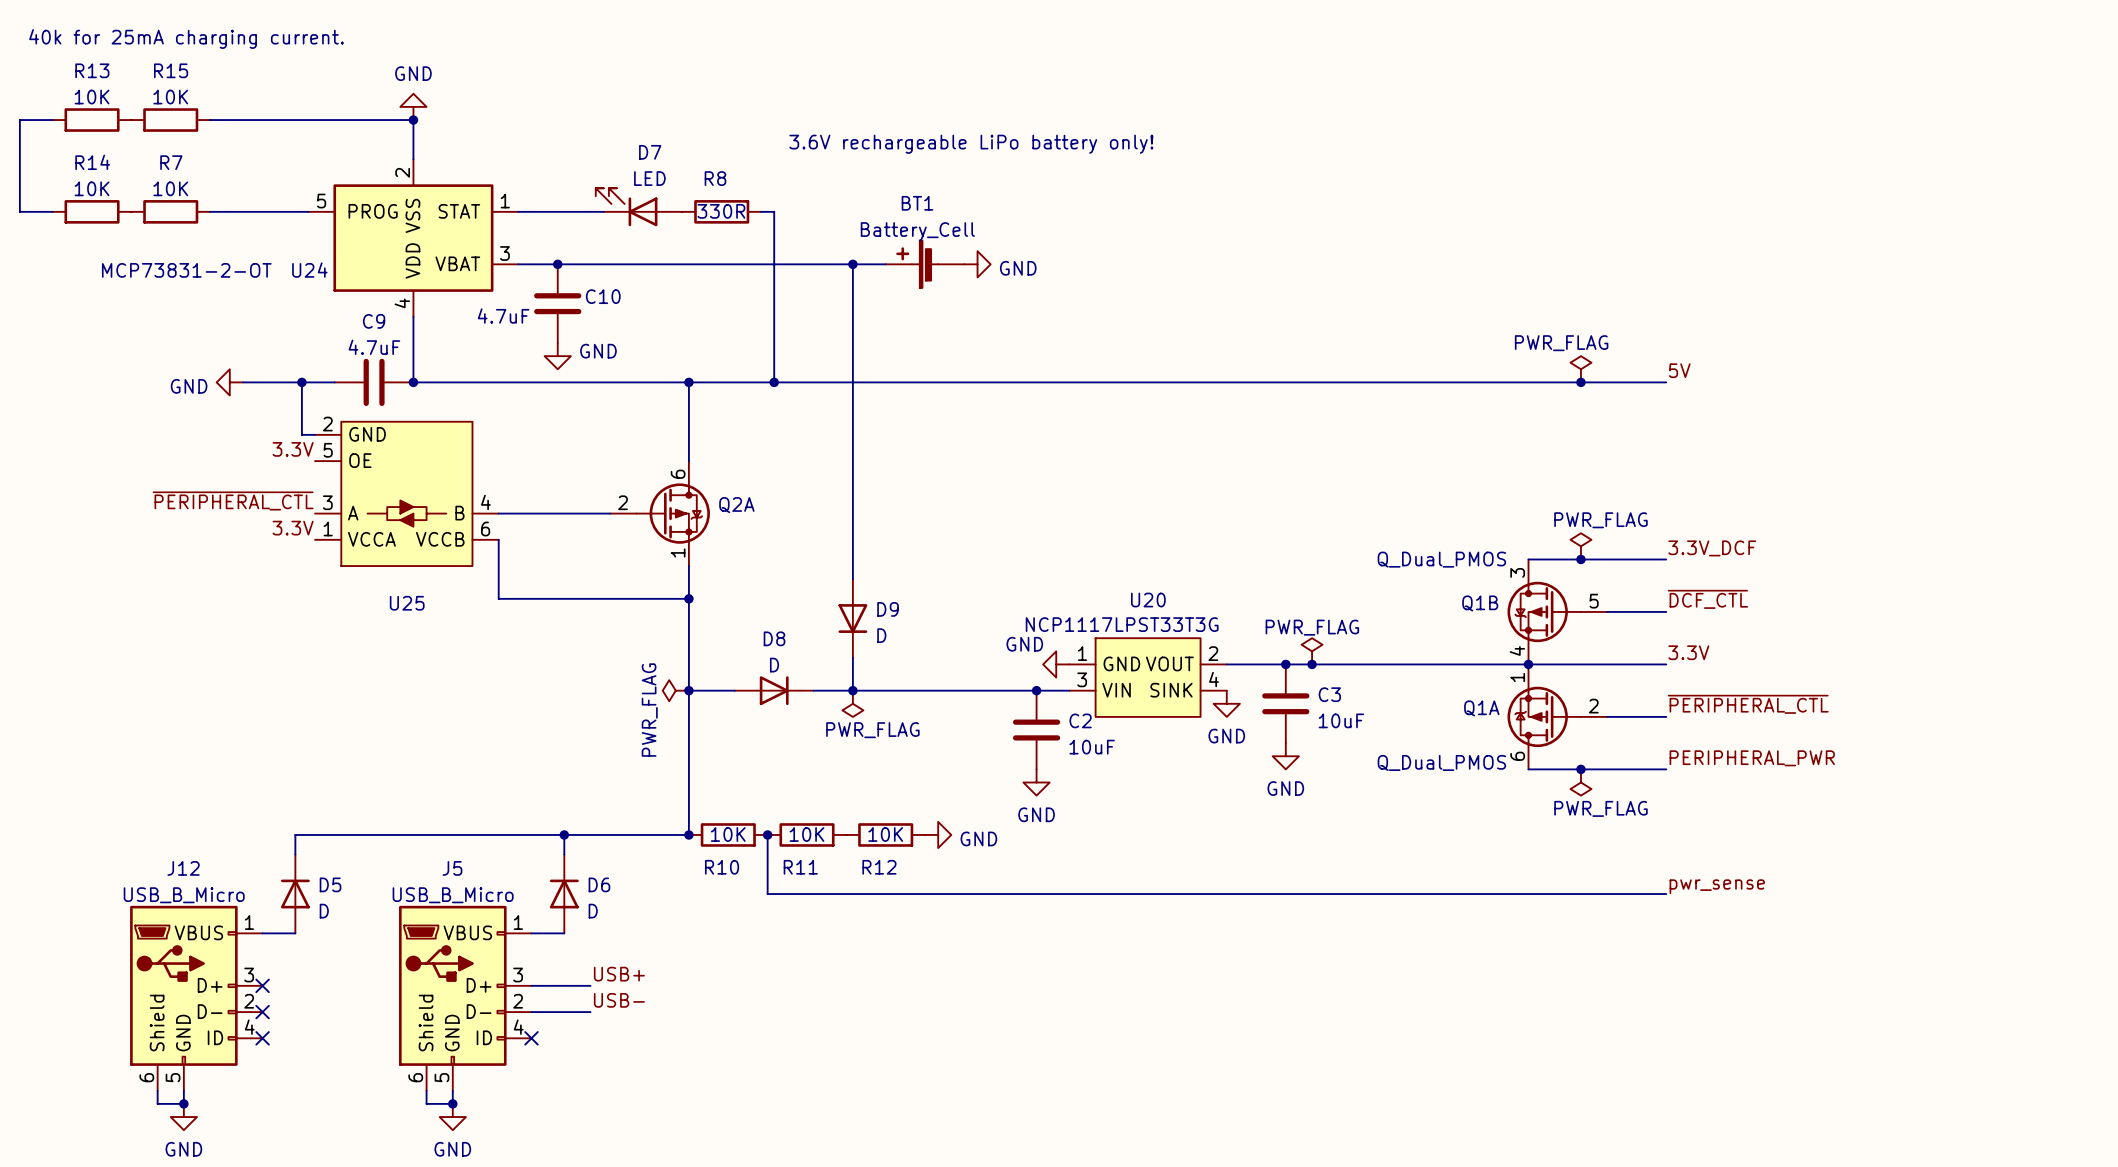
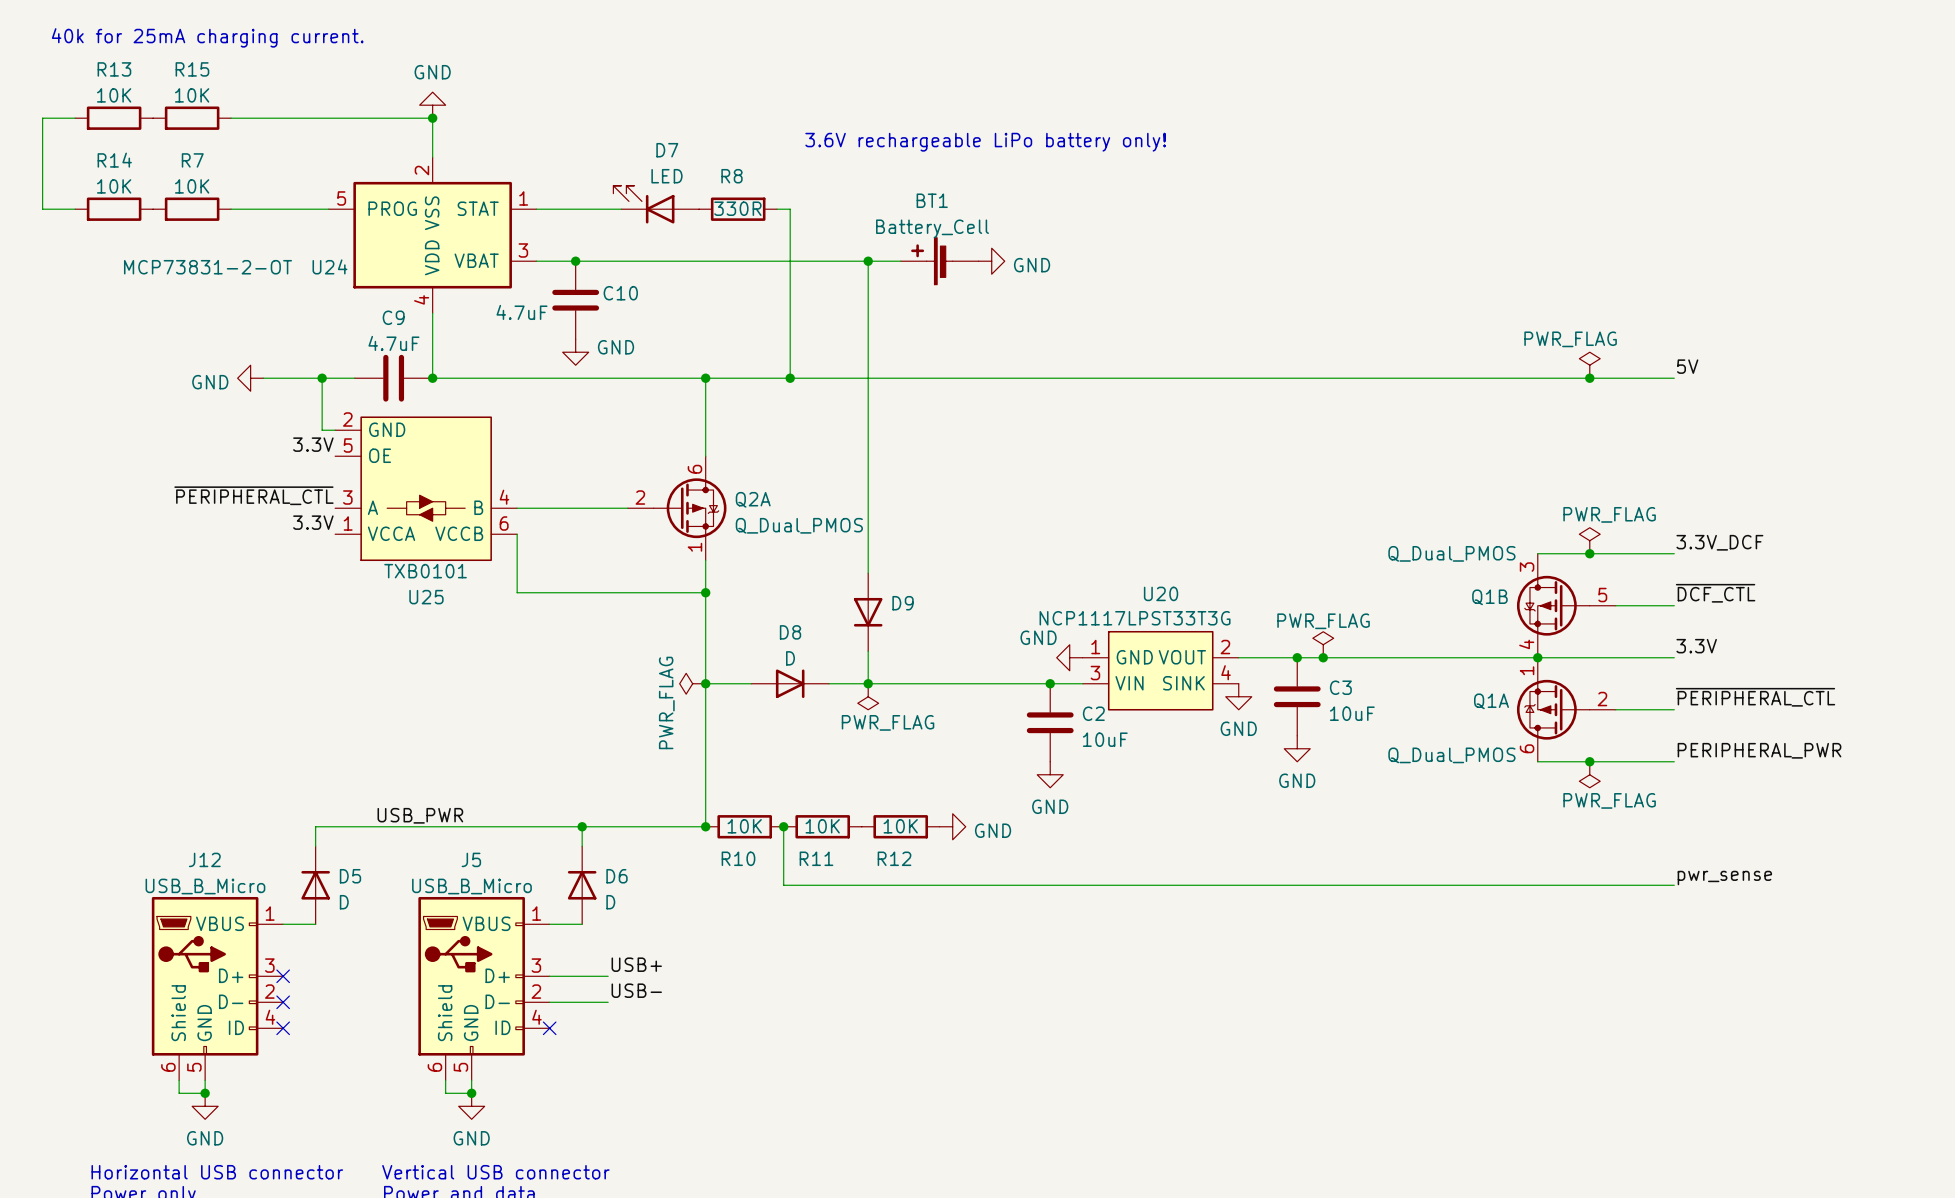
Q2A value: none -> Q_Dual_PMOS (799, 525)
U25 value: none -> TXB0101 (425, 571)
D9 value: D (881, 635) -> none
label: none -> USB_PWR (420, 815)

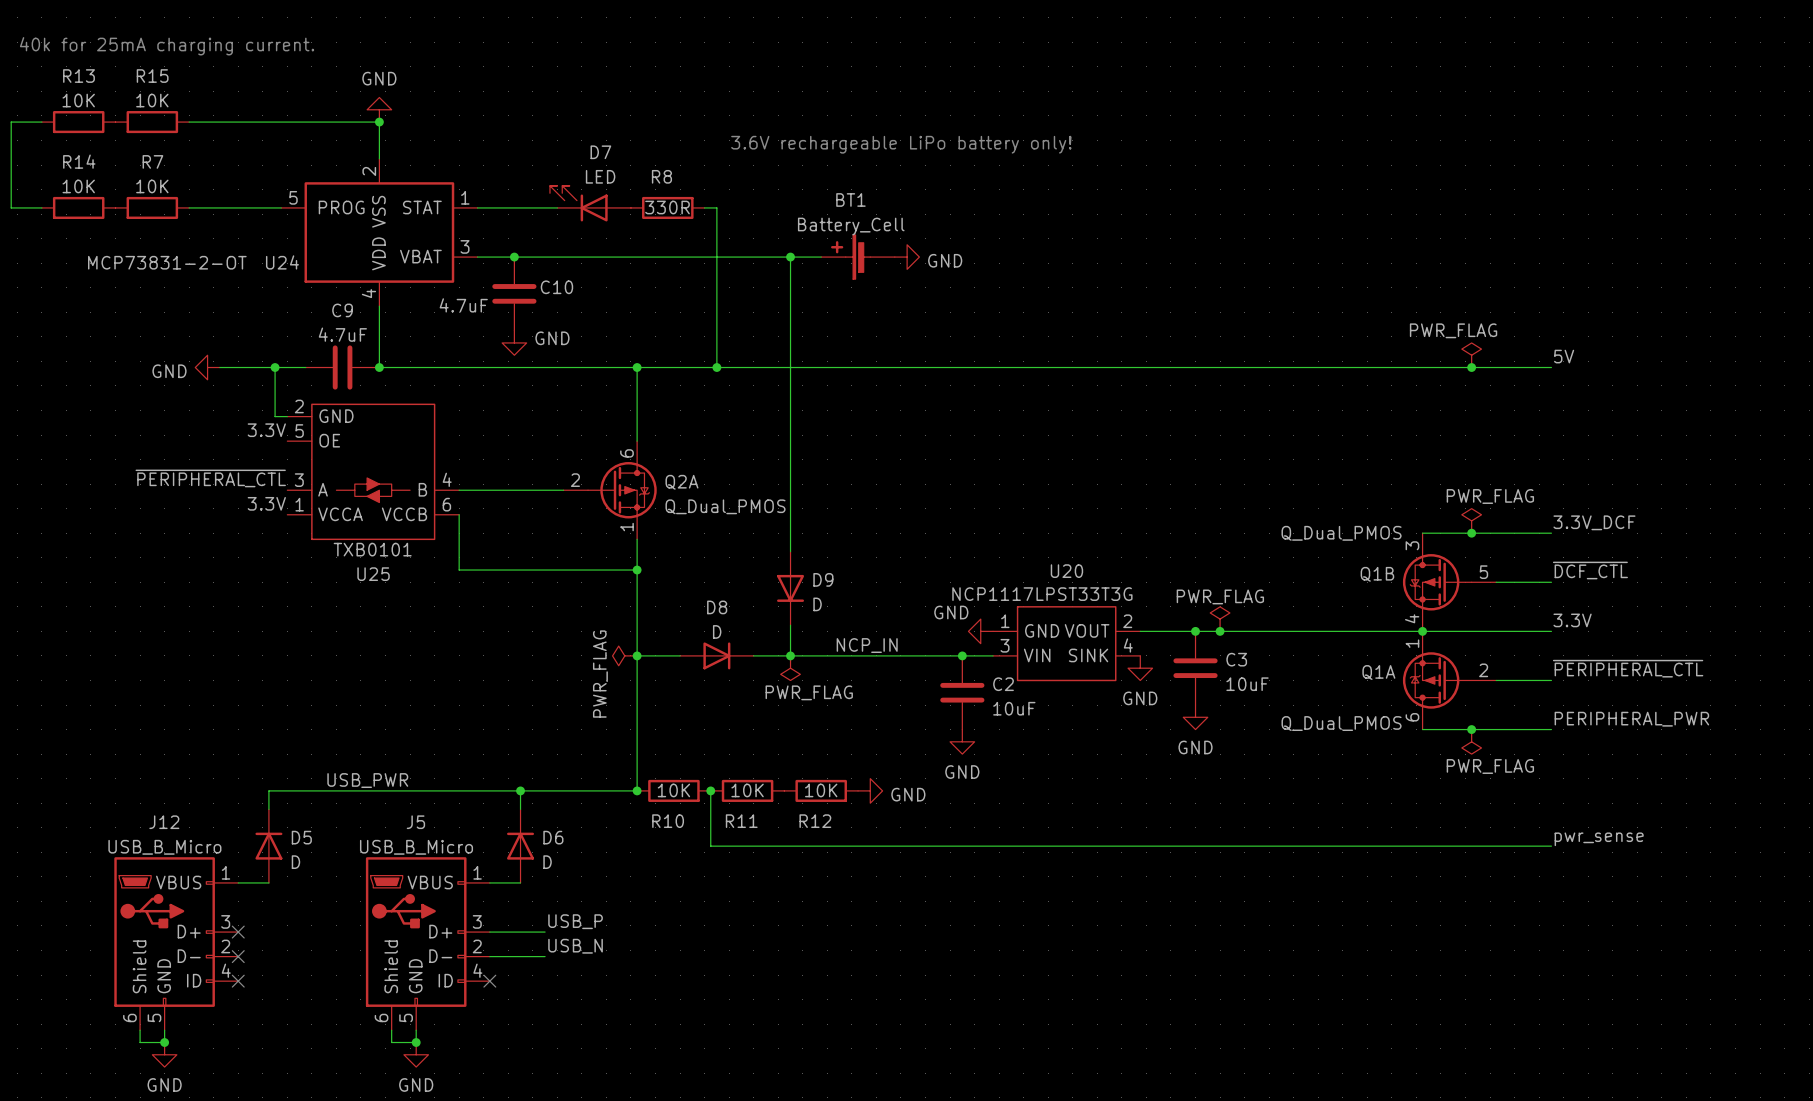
D9 value: none -> D (817, 604)
label: none -> NCP_IN (867, 645)
label: USB+ (636, 964) -> USB_P (575, 921)
label: USB- (636, 990) -> USB_N (575, 946)

